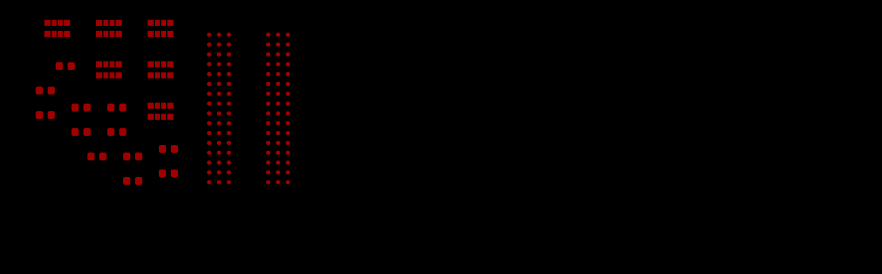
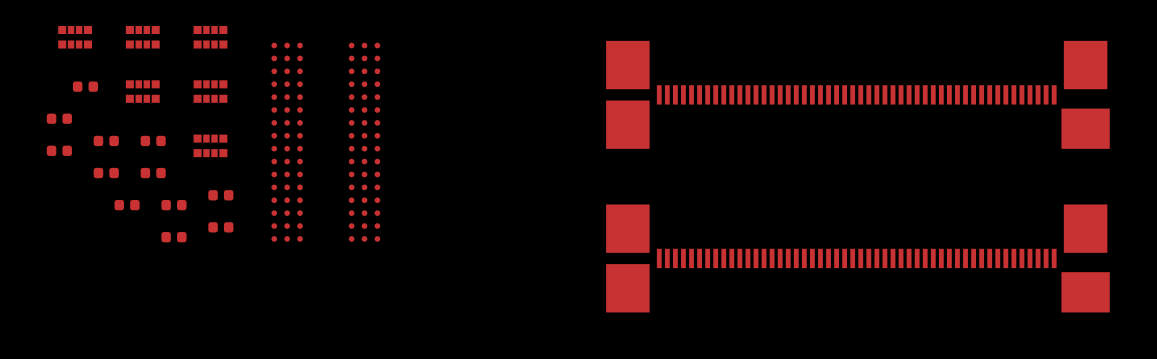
part: none -> (857, 94)
part: none -> (857, 258)

